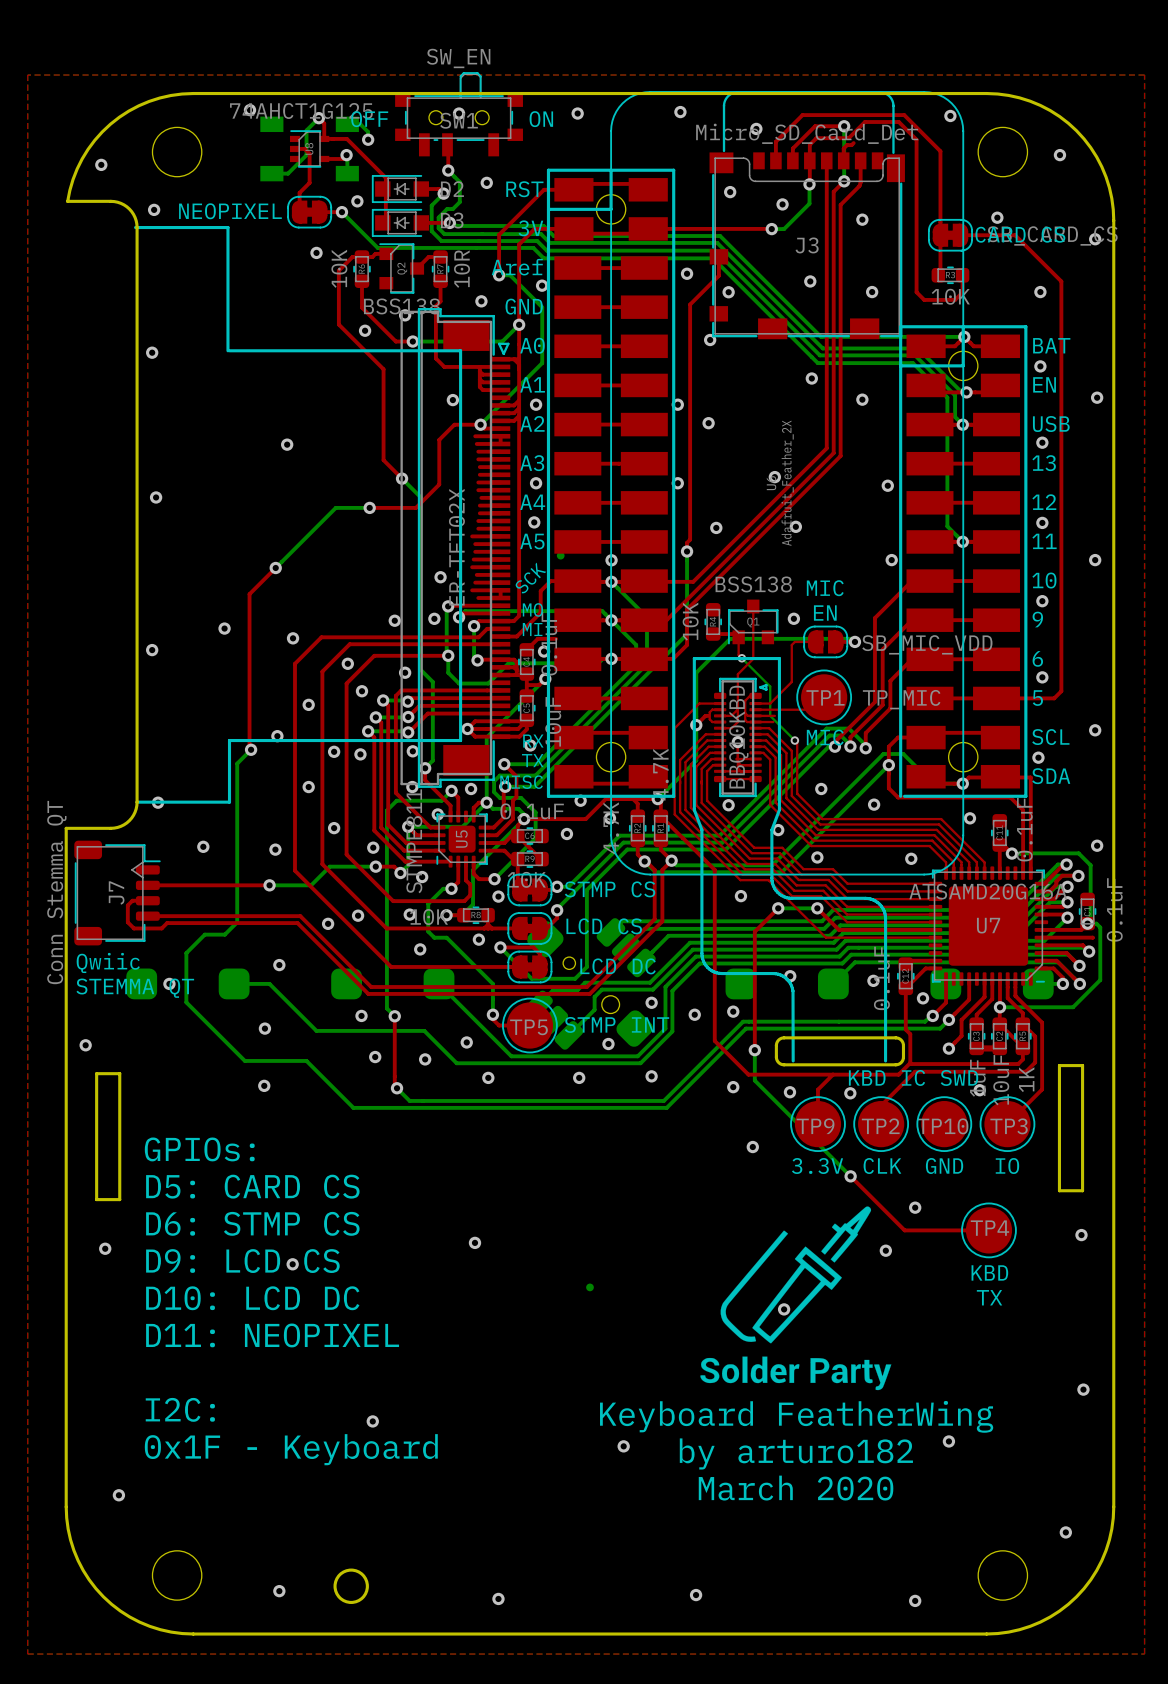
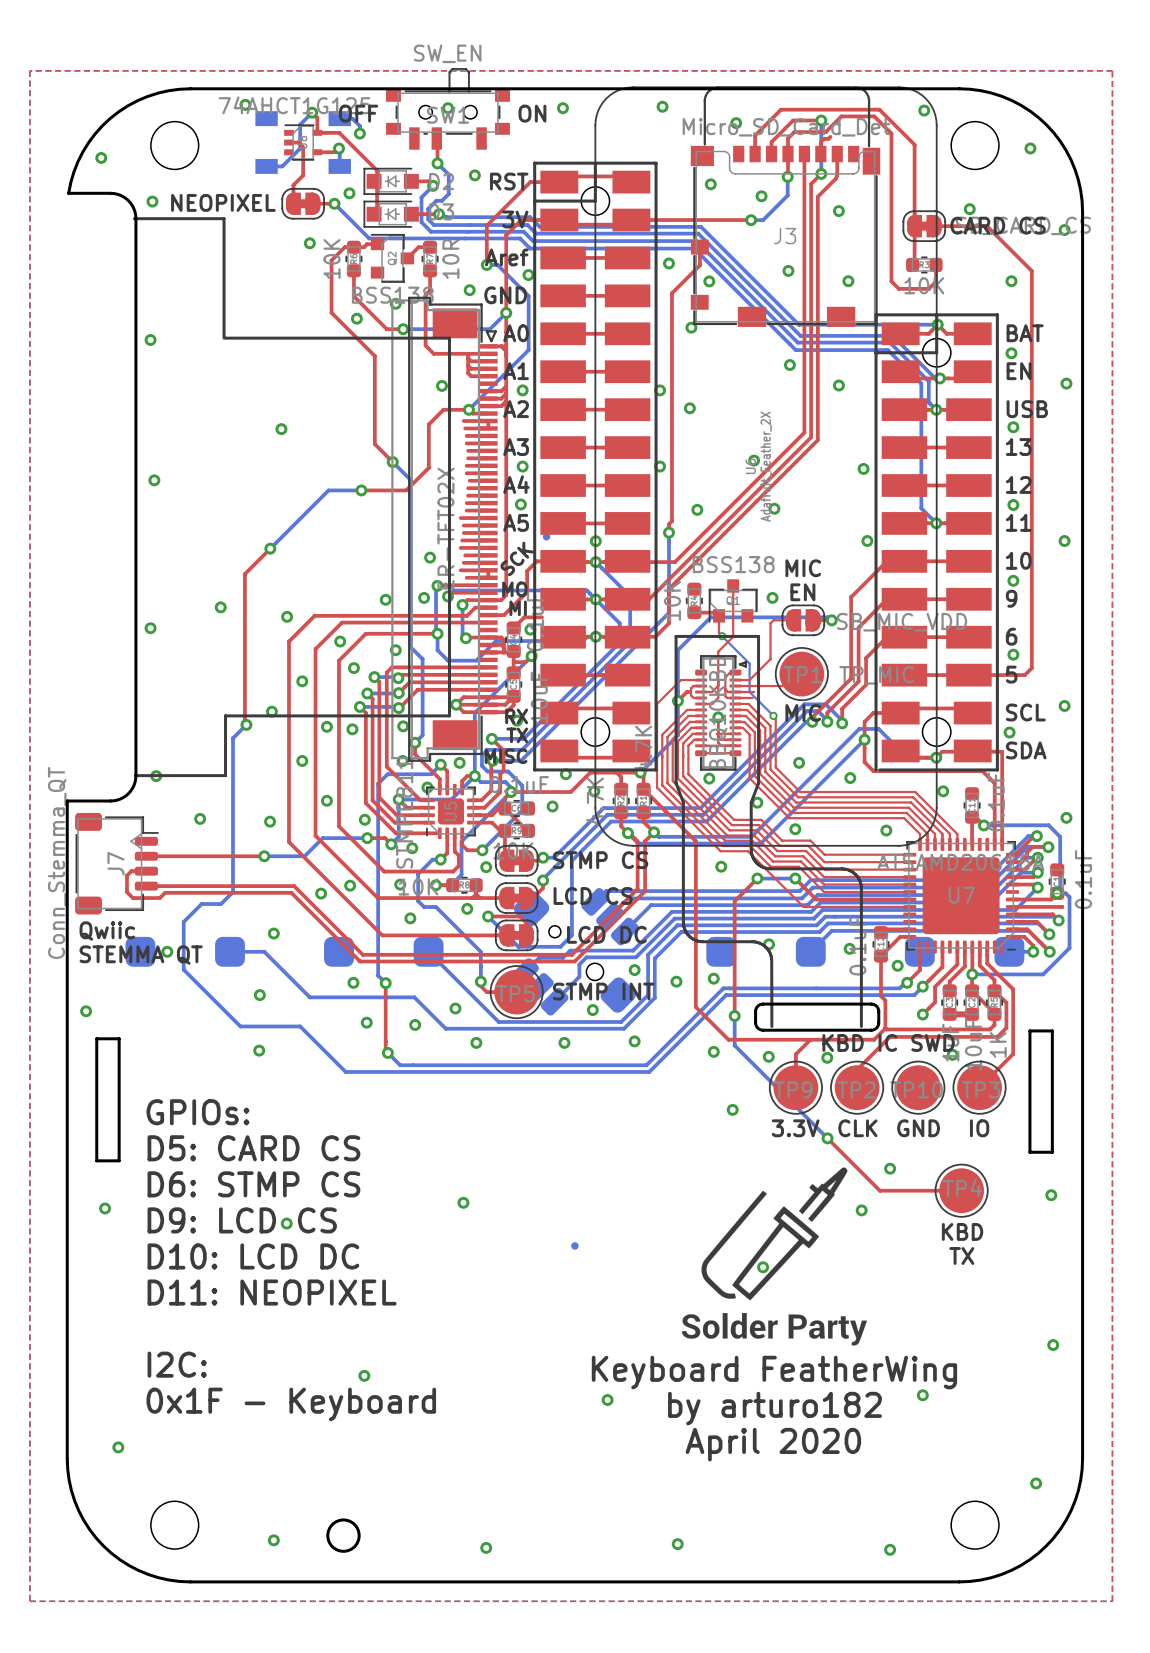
text: March 2020 (796, 1488) -> April 2020 (773, 1444)

